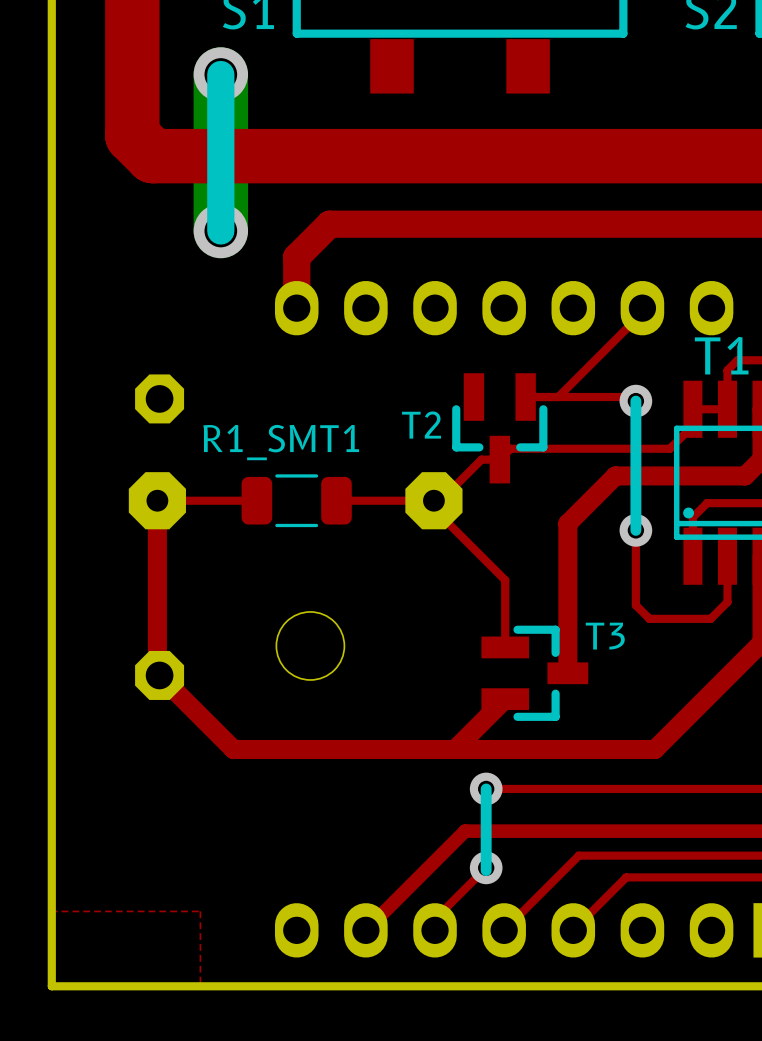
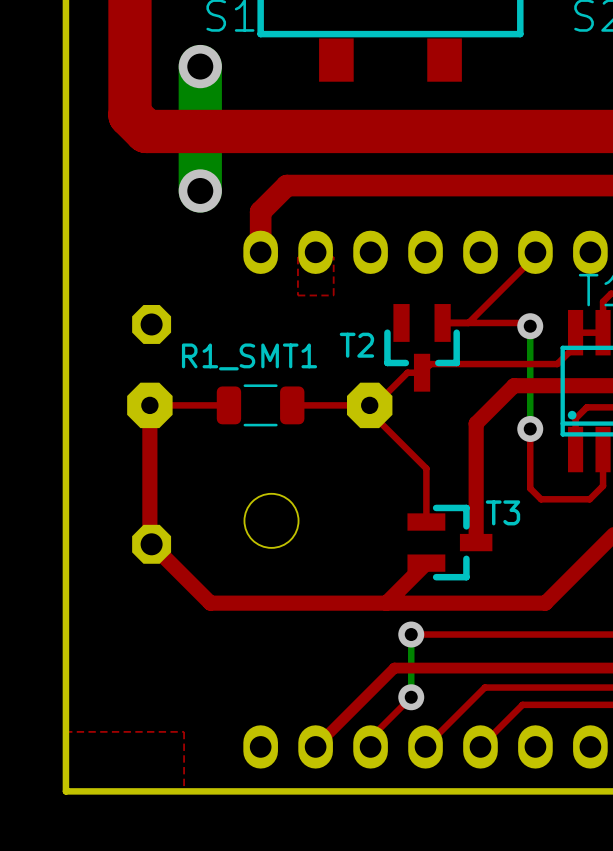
line: (220, 74) (220, 230) -> none
top zone outline: none -> (297, 257) (297, 295) (333, 295) (333, 257) (297, 257)
line: (635, 401) (635, 530) -> none
line: (486, 788) (486, 870) -> none

